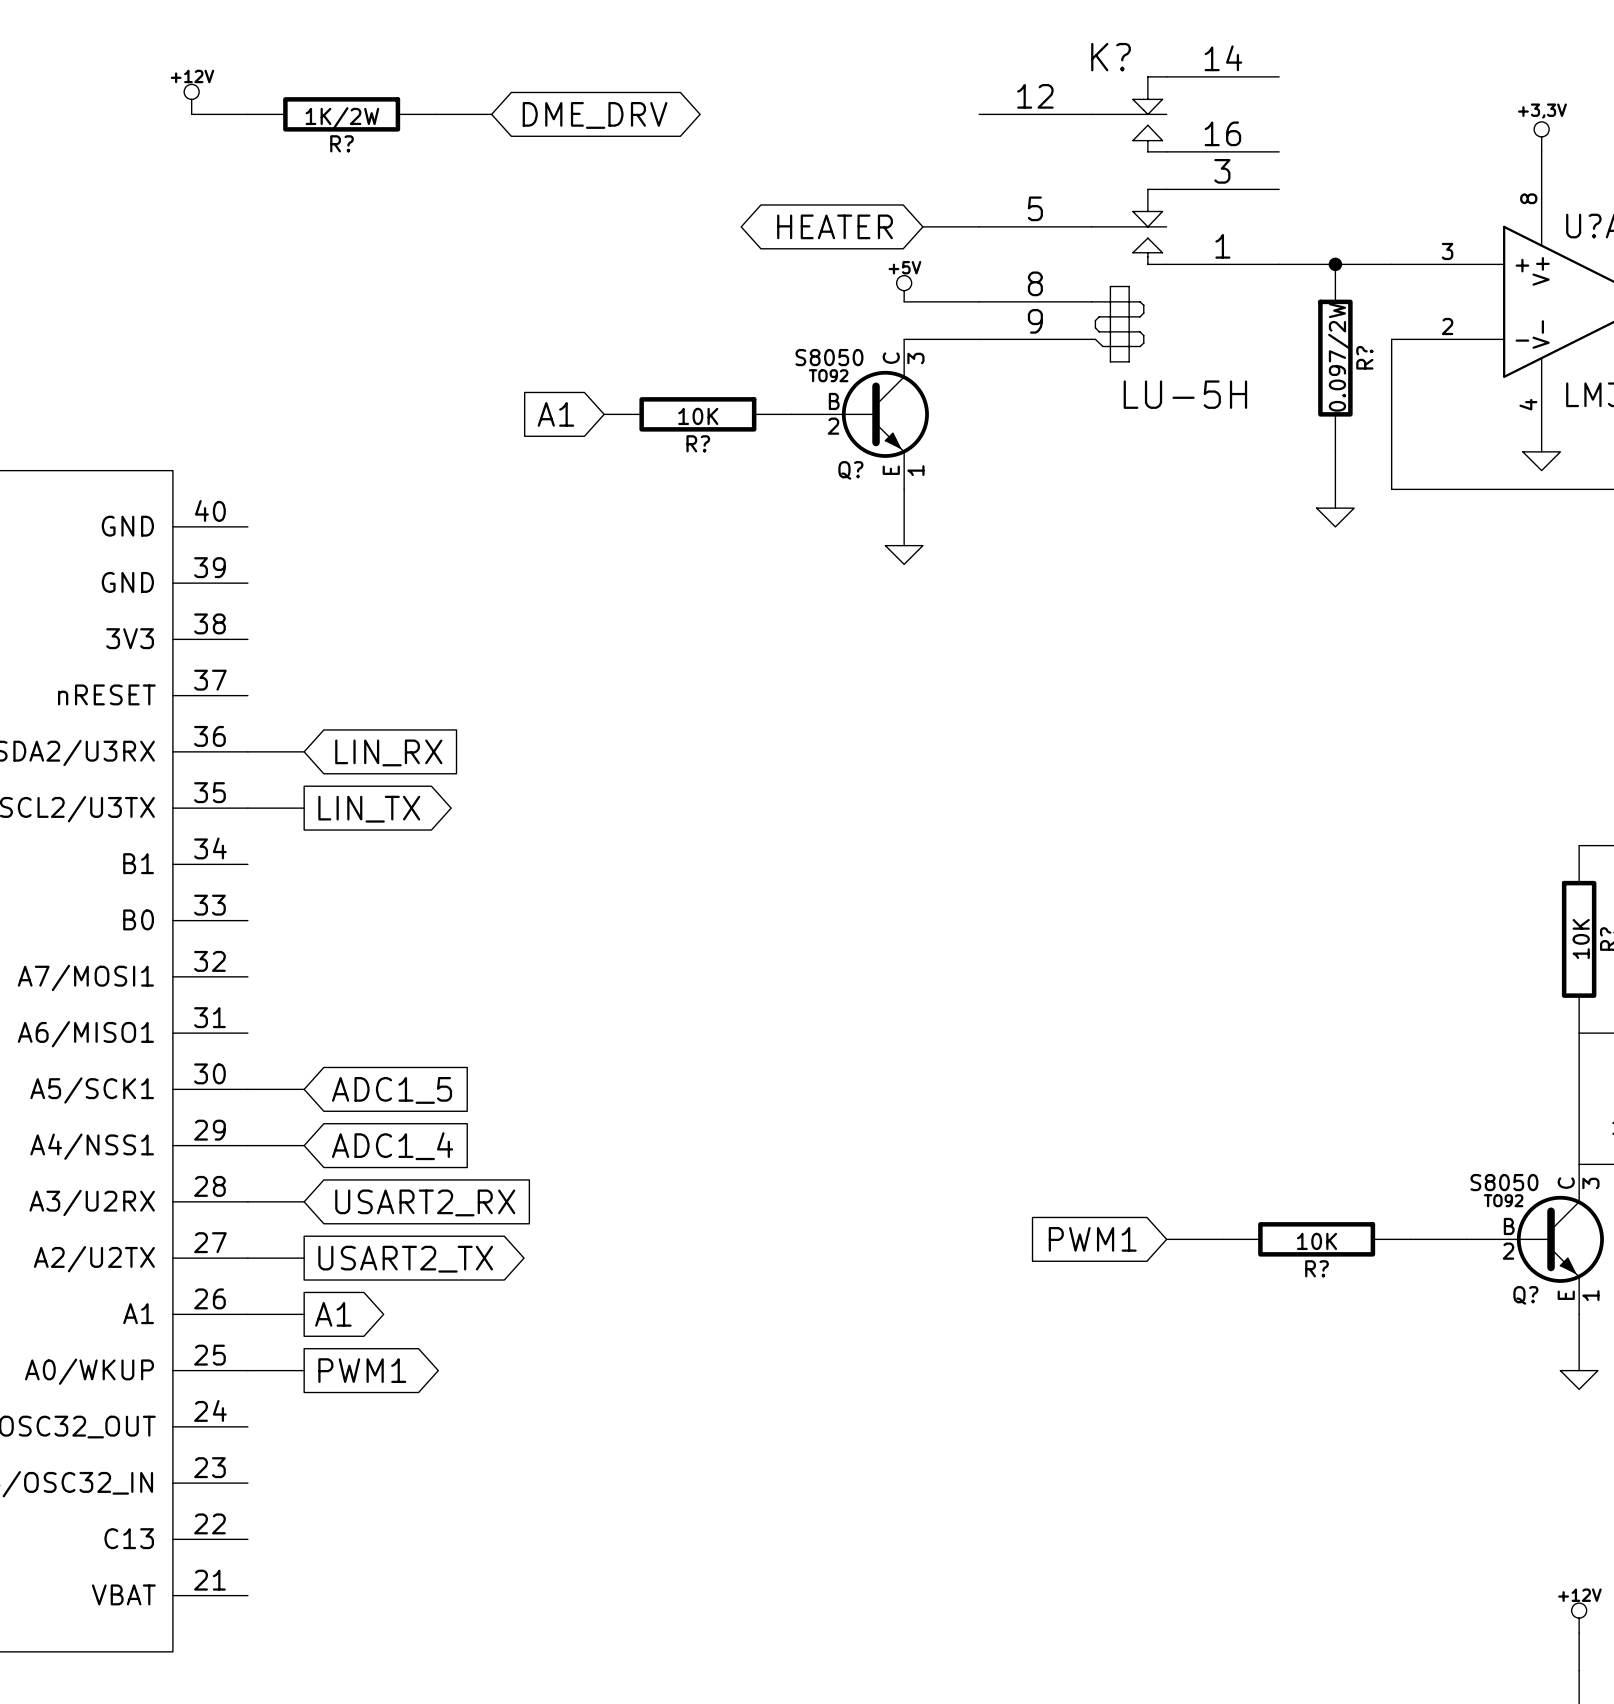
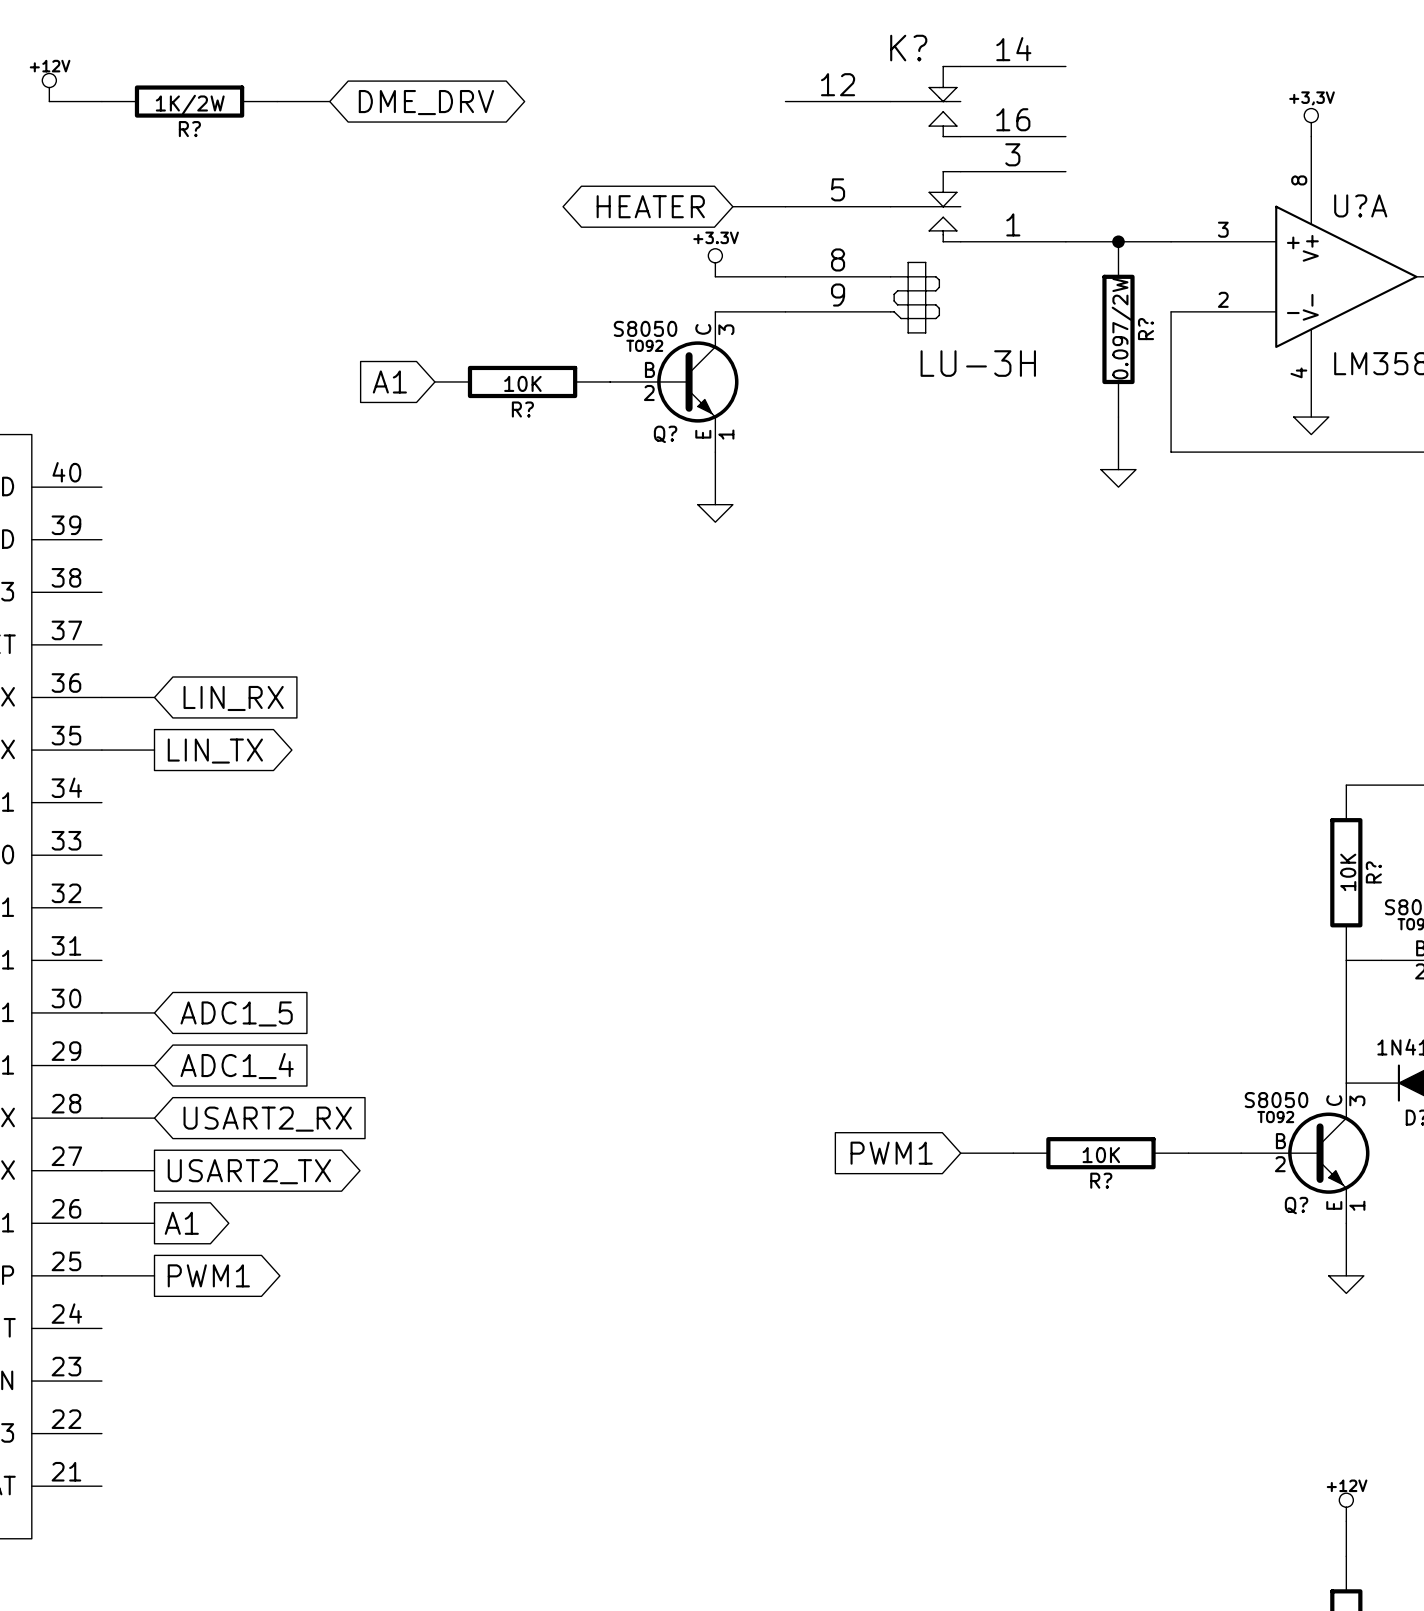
power symbol: +5V (904, 288) -> +3.3V (715, 262)
K? value: LU-5H (1185, 394) -> LU-3H (978, 363)

